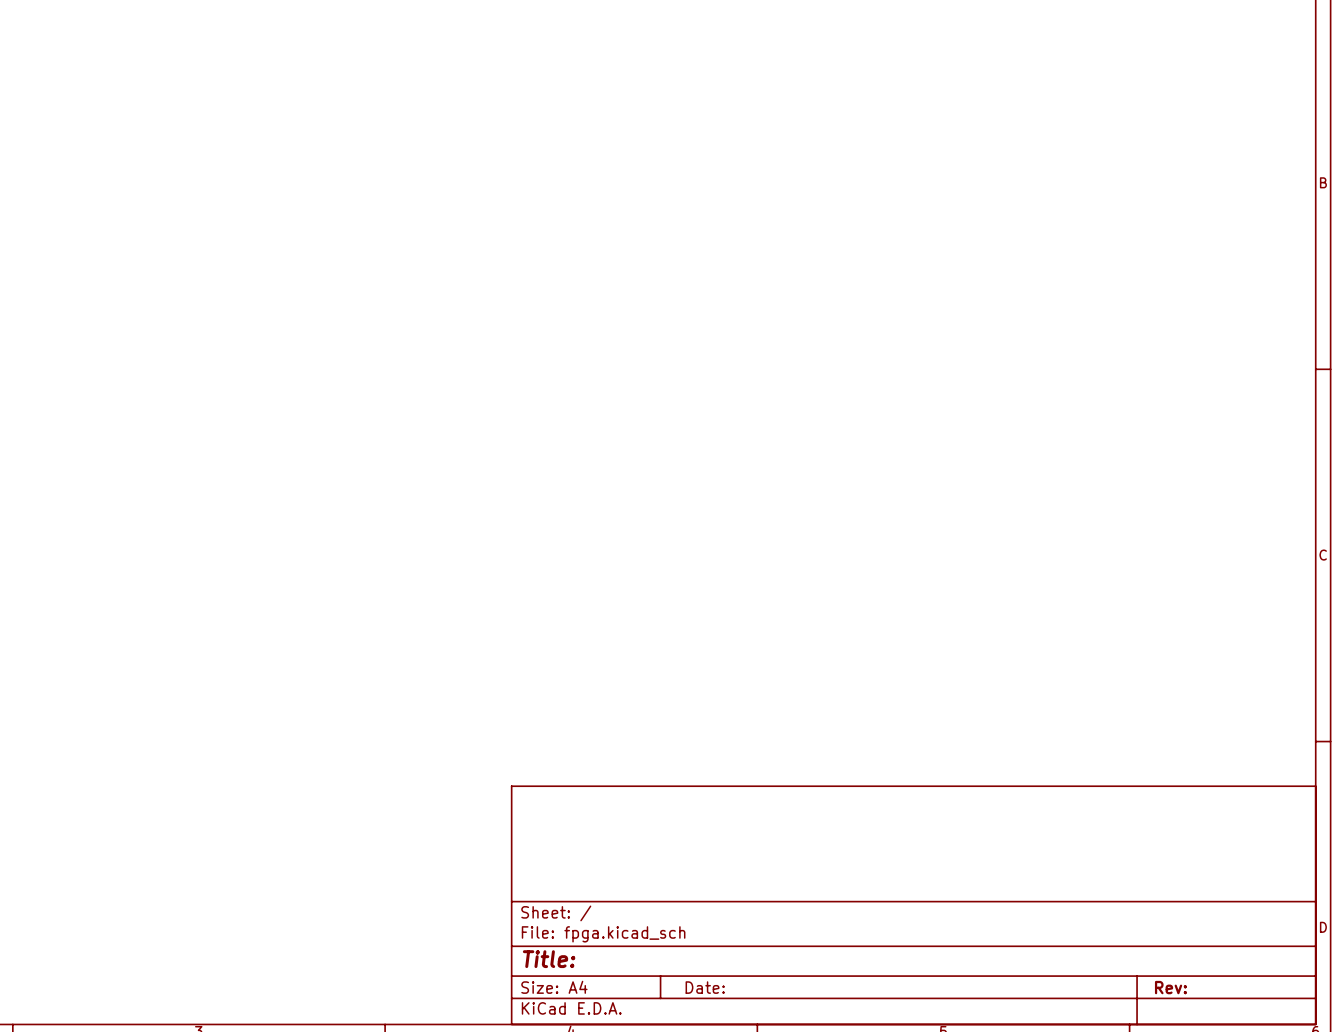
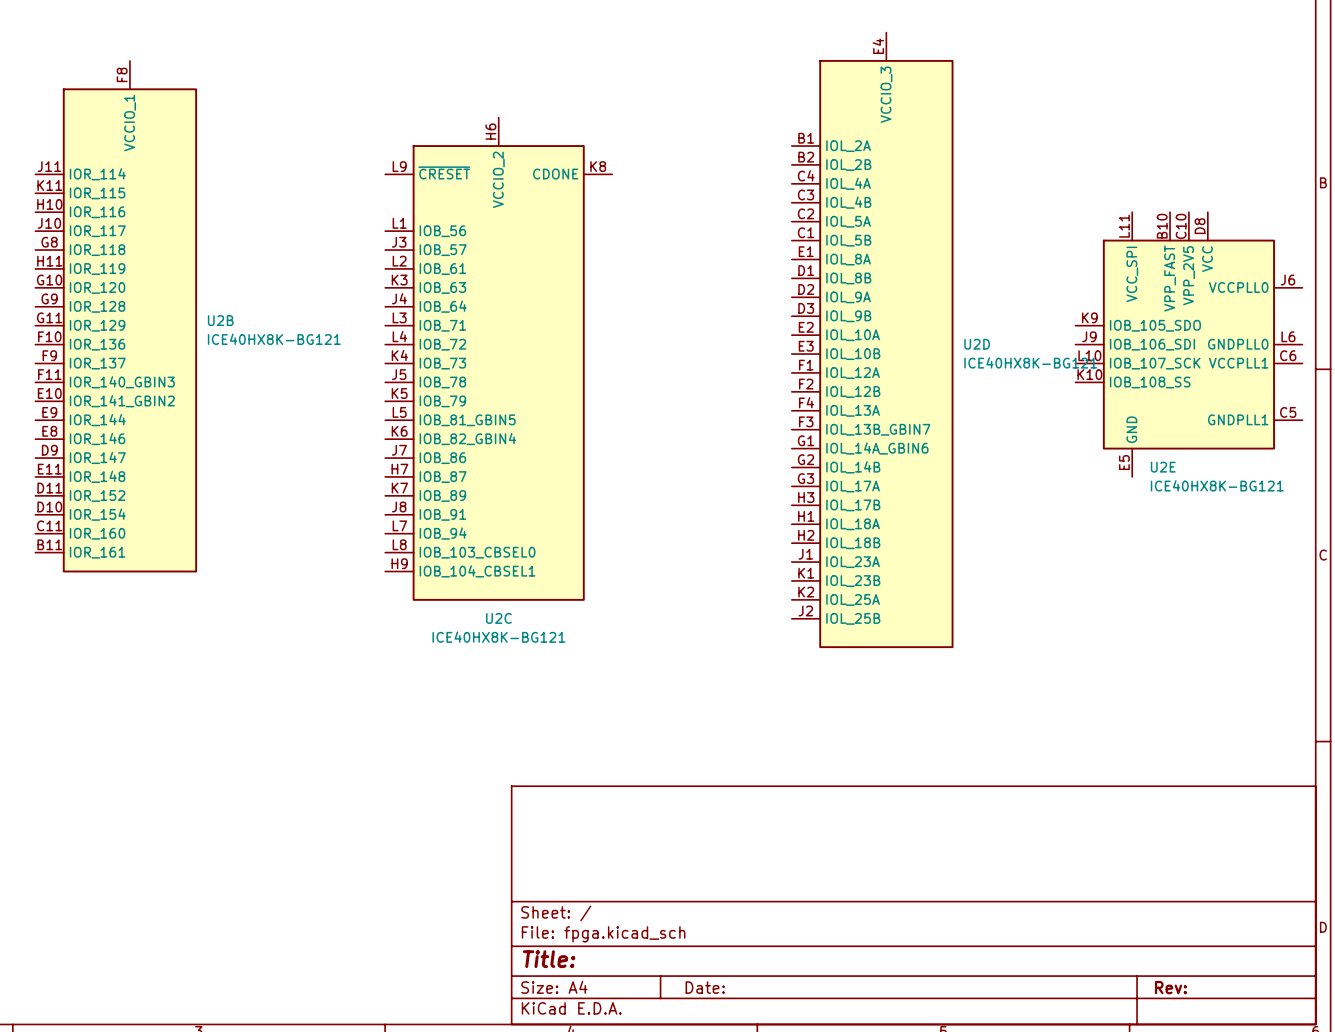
U2B: none -> ICE40HX8K-BG121 (116, 316)
U2D: none -> ICE40HX8K-BG121 (872, 340)
U2E: none -> ICE40HX8K-BG121 (1188, 344)
U2C: none -> ICE40HX8K-BG121 (498, 359)

